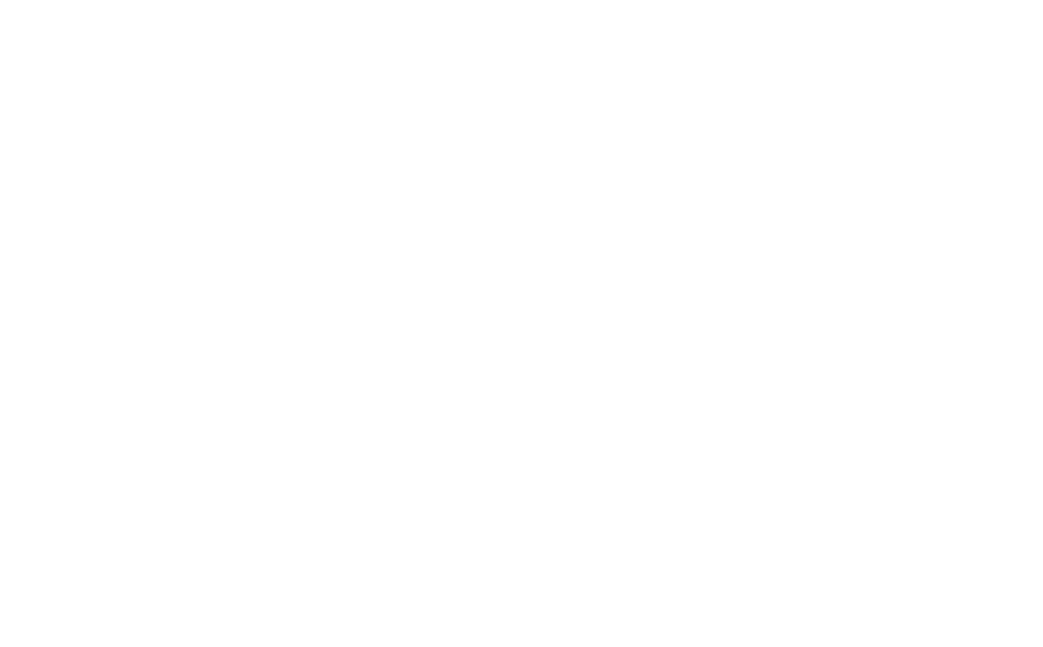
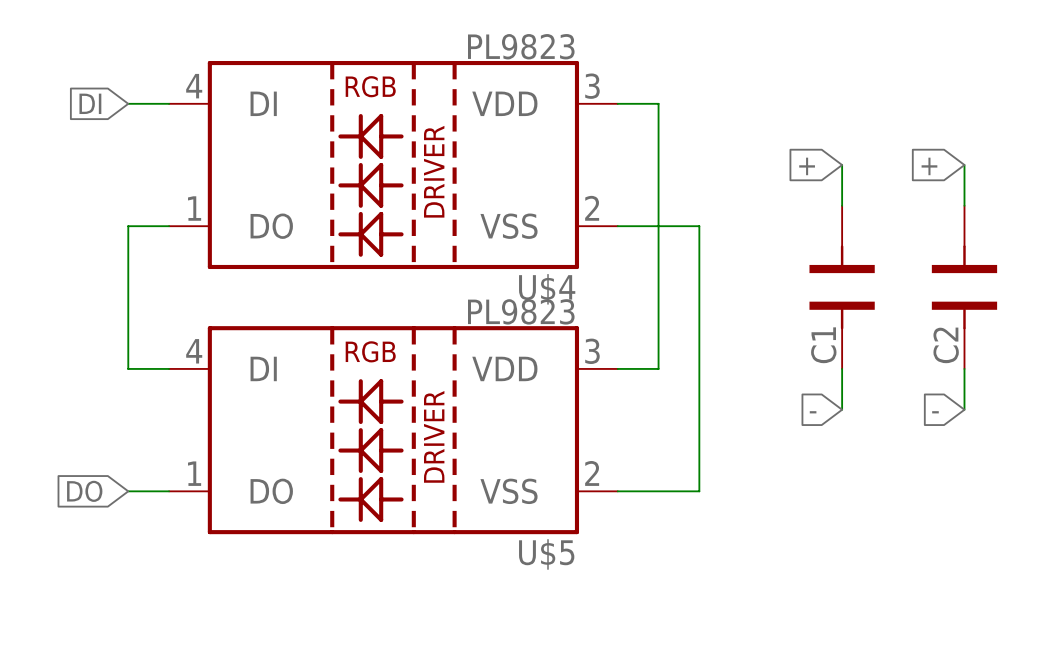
global label: none -> DI (90, 103)
wire: none -> (128, 103) (169, 103)
wire: none -> (617, 103) (658, 103) (658, 368) (617, 368)
U$4: none -> (393, 165)
wire: none -> (842, 165) (842, 205)
wire: none -> (964, 165) (964, 205)
global label: none -> + (807, 166)
global label: none -> + (929, 166)
wire: none -> (169, 226) (128, 226) (128, 368) (169, 368)
wire: none -> (617, 226) (699, 226) (699, 491) (617, 491)
C1: none -> (842, 287)
C2: none -> (964, 287)
wire: none -> (842, 368) (842, 409)
wire: none -> (964, 368) (964, 409)
global label: none -> - (813, 412)
global label: none -> - (935, 412)
U$5: none -> (393, 430)
global label: none -> DO (84, 491)
wire: none -> (128, 491) (169, 491)

